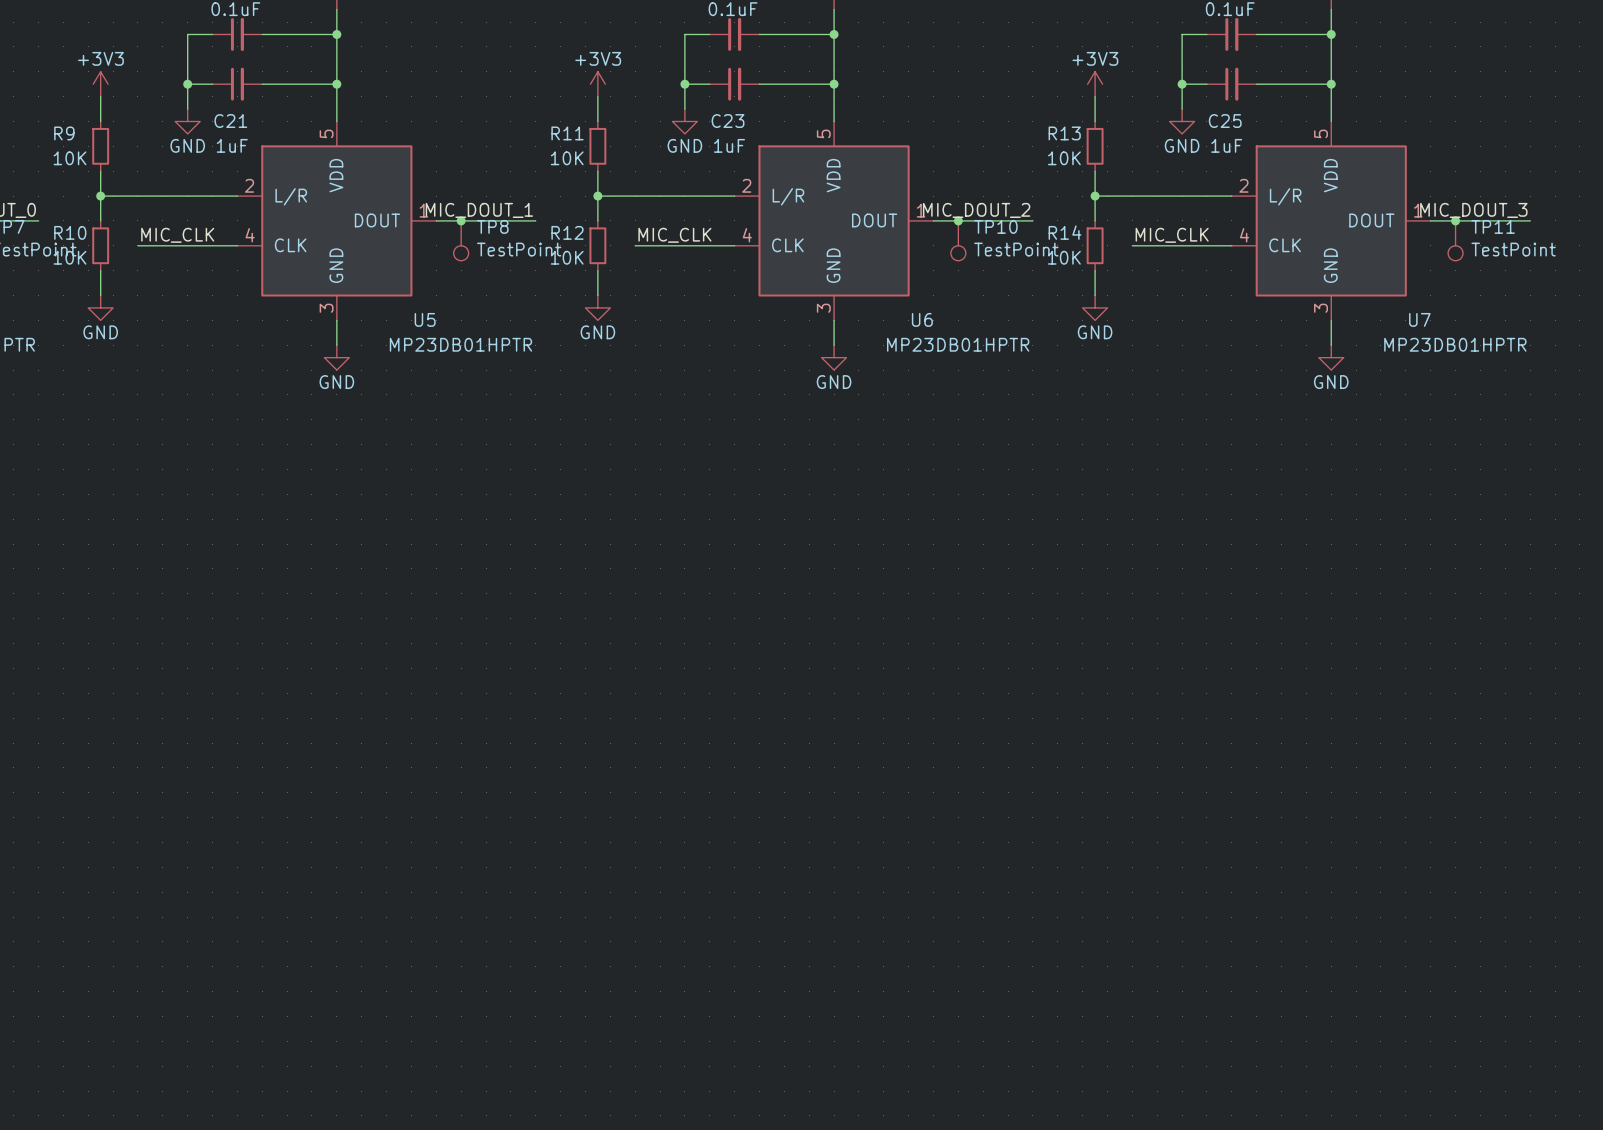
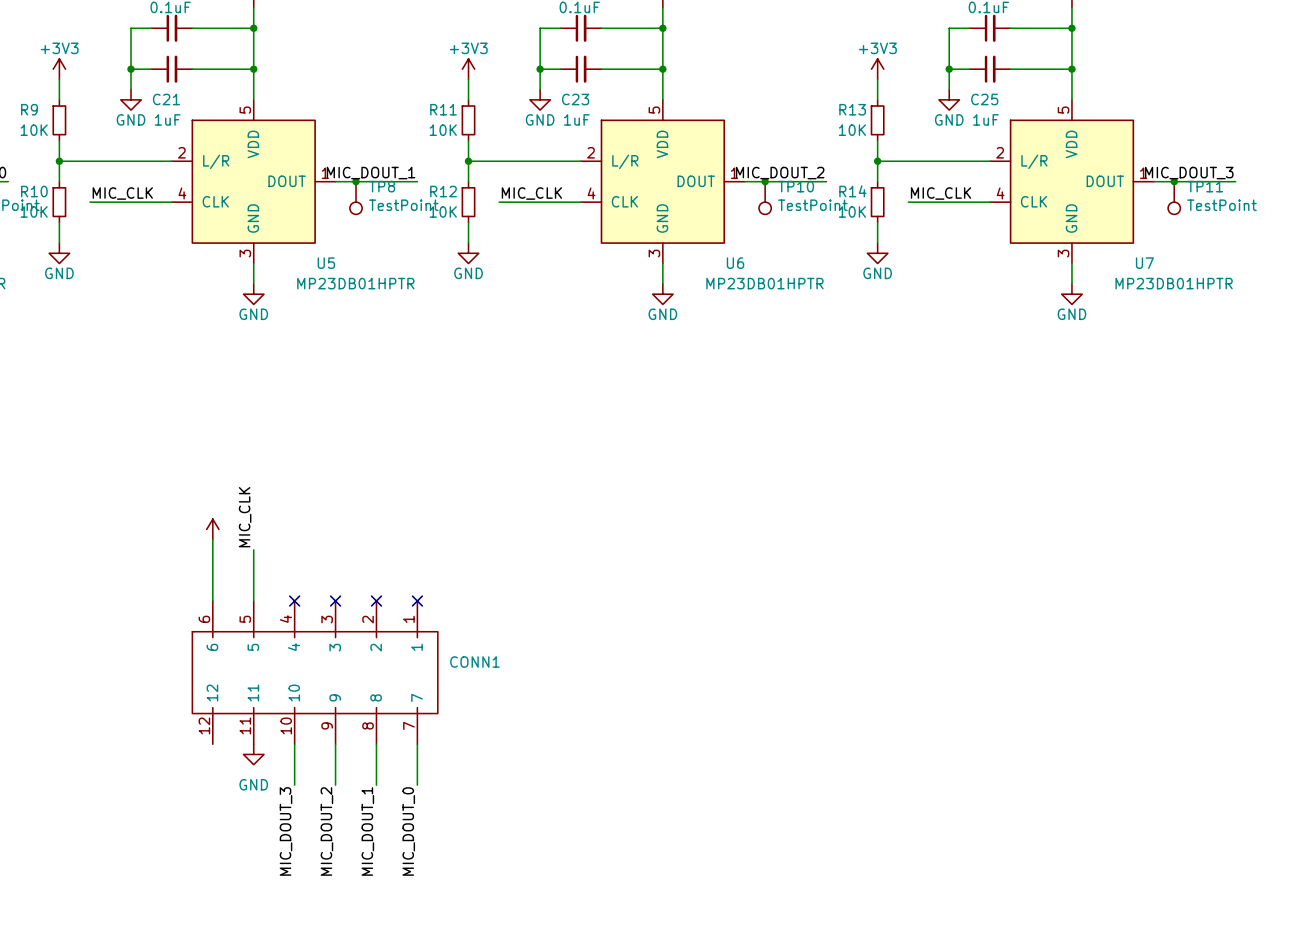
label: none -> MIC_CLK (245, 517)
power symbol: none -> (212, 529)
wire: none -> (212, 539) (212, 601)
wire: none -> (253, 549) (253, 601)
no-connect mark: none -> (294, 601)
no-connect mark: none -> (335, 601)
no-connect mark: none -> (376, 601)
no-connect mark: none -> (417, 601)
CONN1: none -> (315, 672)
wire: none -> (294, 744) (294, 785)
wire: none -> (335, 744) (335, 785)
wire: none -> (376, 744) (376, 785)
wire: none -> (417, 744) (417, 785)
power symbol: none -> GND (253, 754)
label: none -> MIC_DOUT_3 (286, 831)
label: none -> MIC_DOUT_2 (326, 831)
label: none -> MIC_DOUT_1 (367, 831)
label: none -> MIC_DOUT_0 (408, 831)

